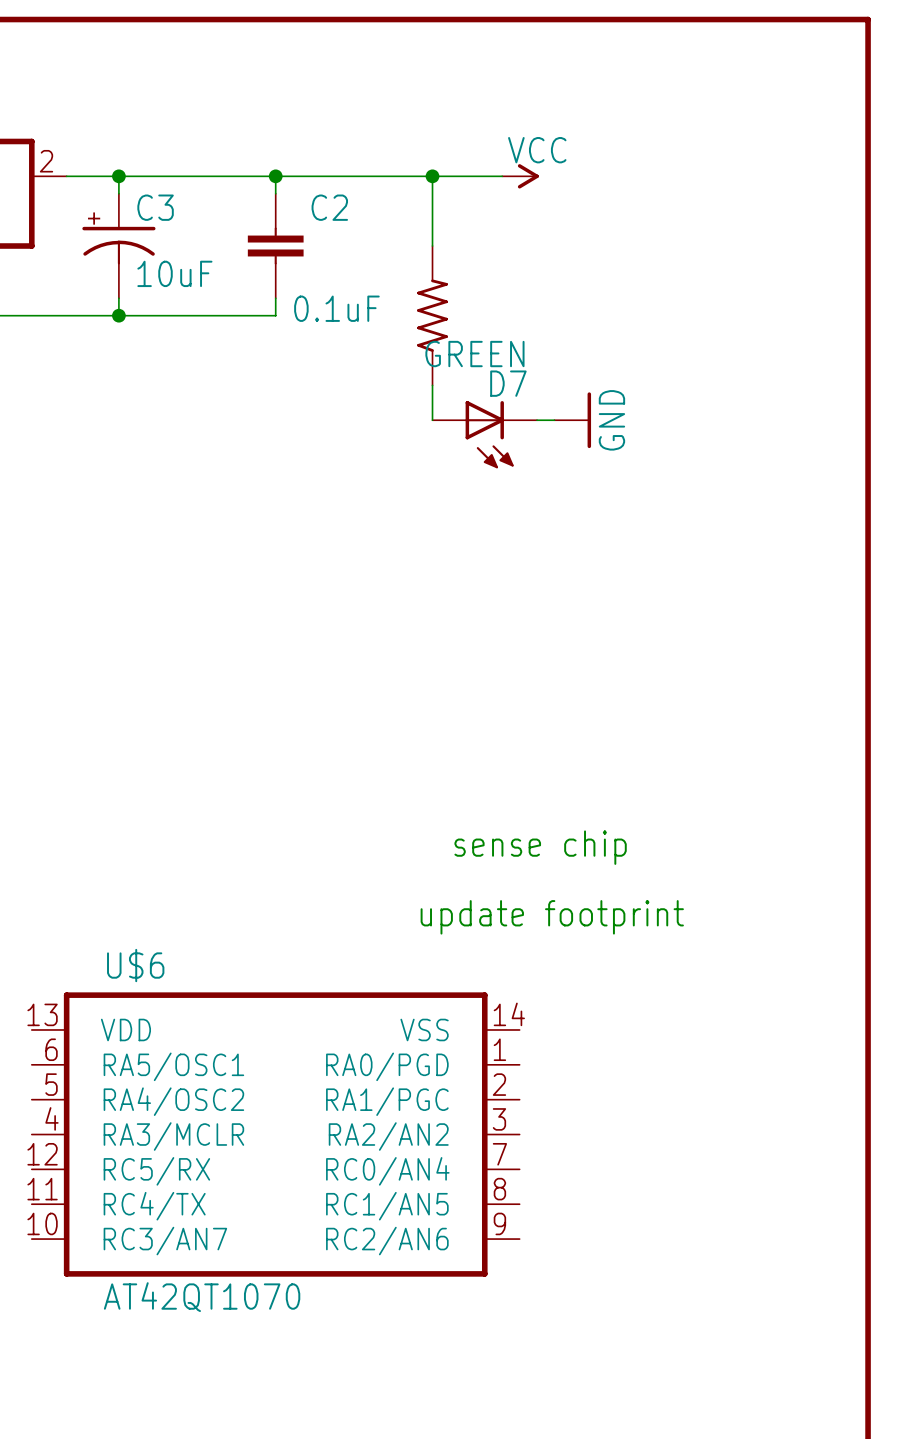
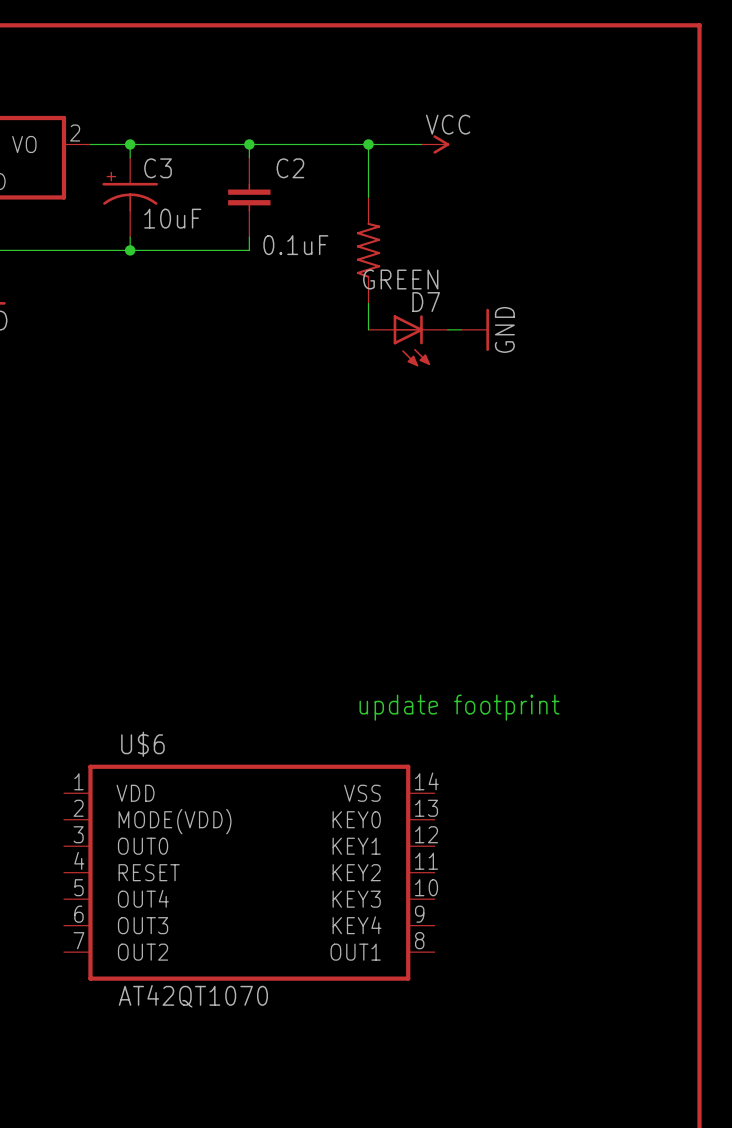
text: sense chip (540, 847) -> none
U$6 symbol: [31, 992, 520, 1277] -> [63, 764, 435, 981]

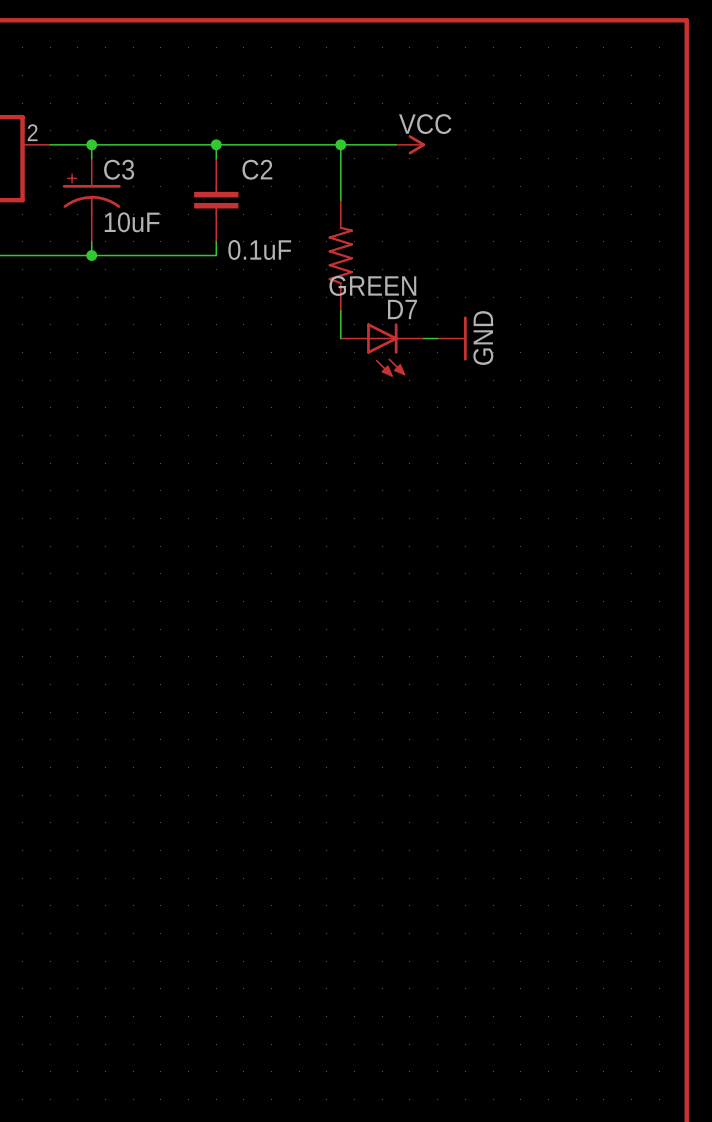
text: update footprint (459, 707) -> none
U$6: AT42QT1070 (249, 872) -> none

